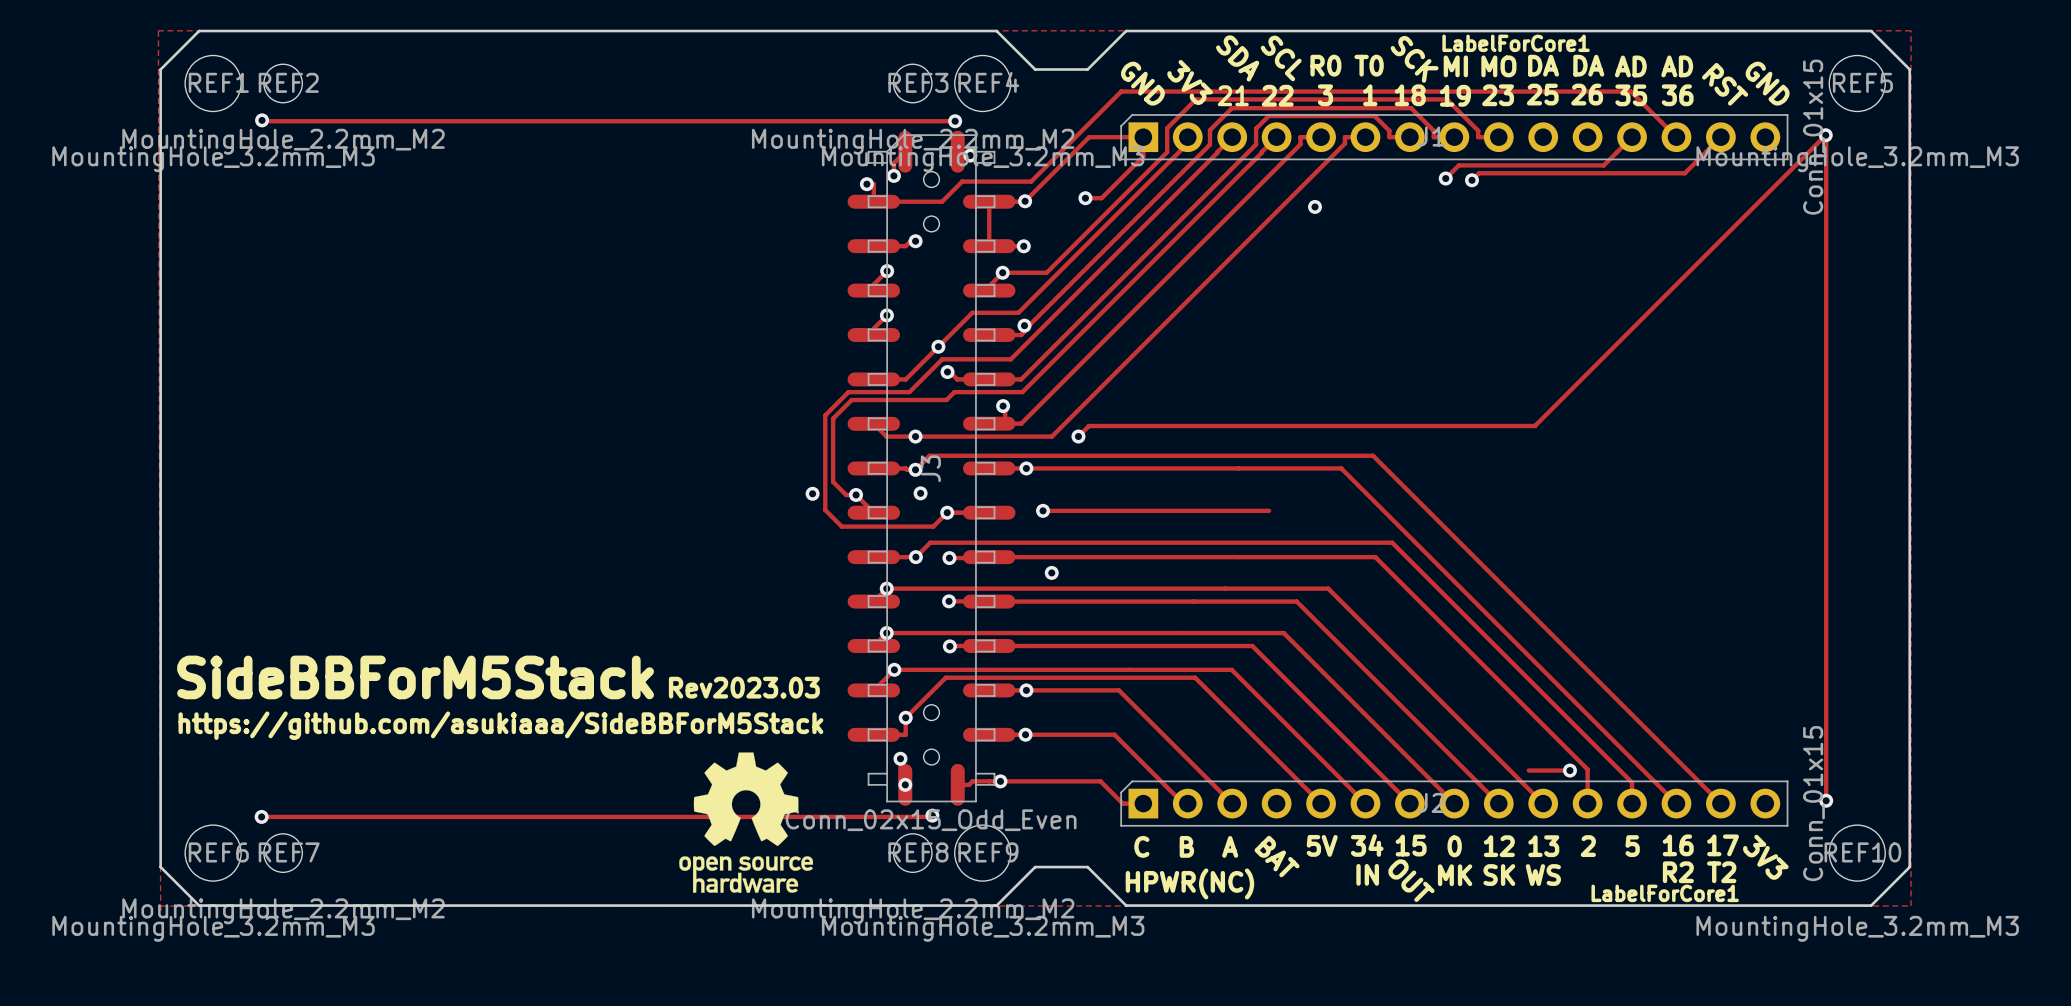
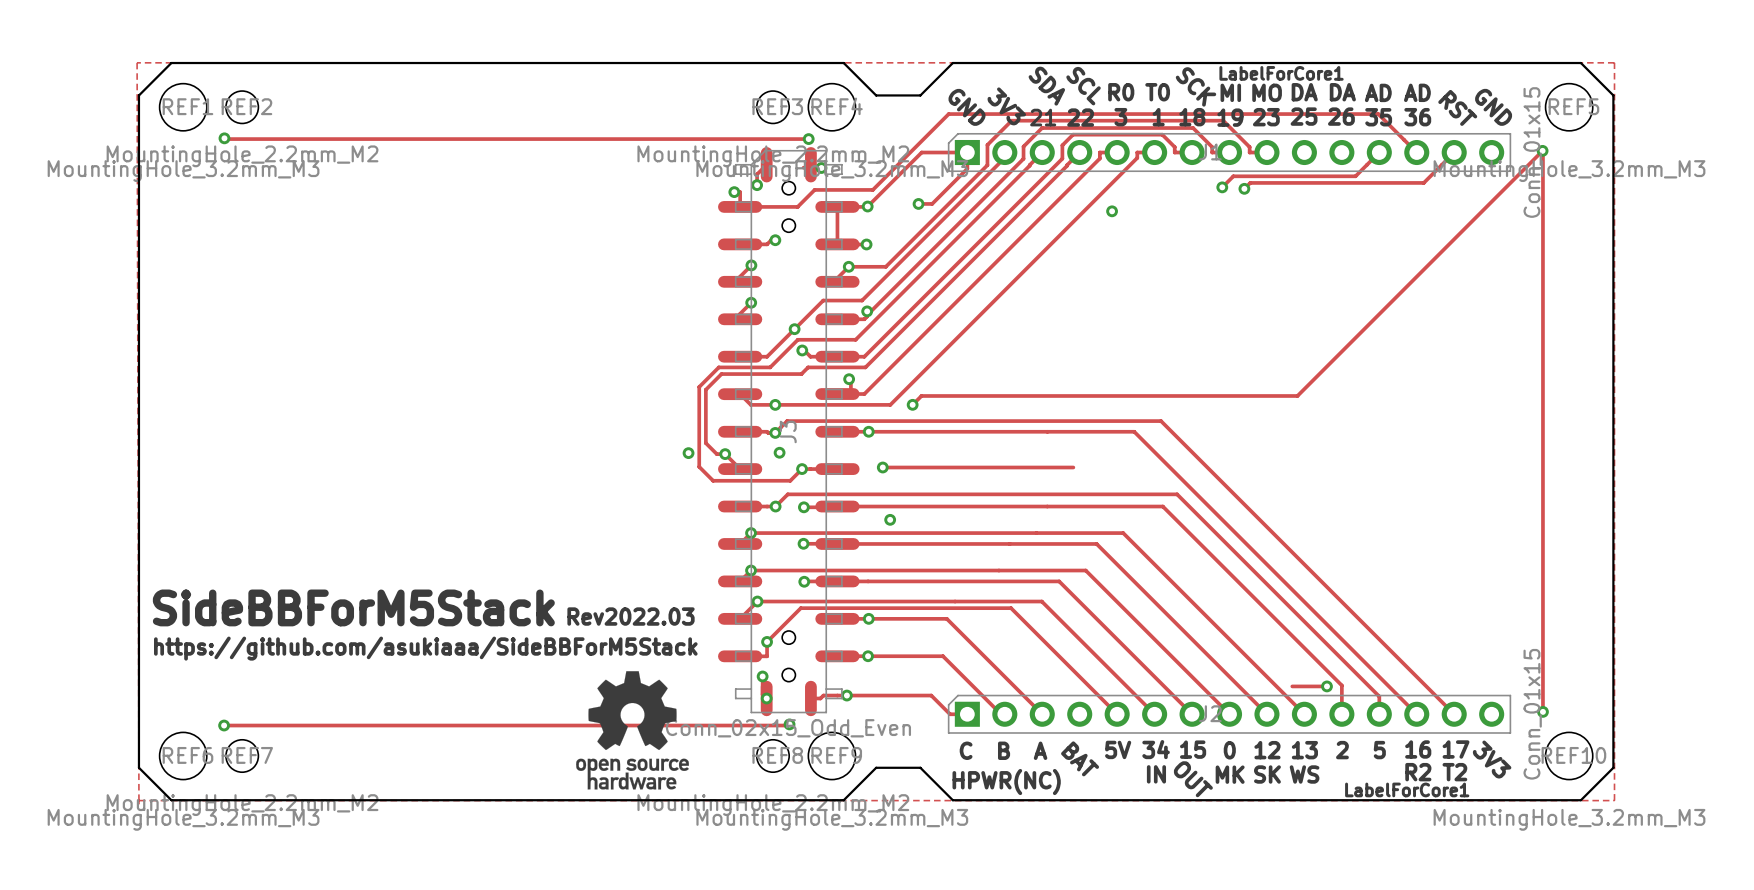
text: Rev2023.03 (744, 687) -> Rev2022.03 (631, 616)

